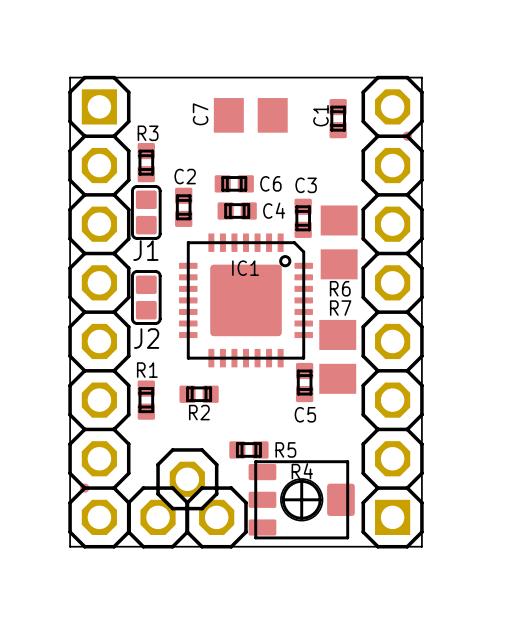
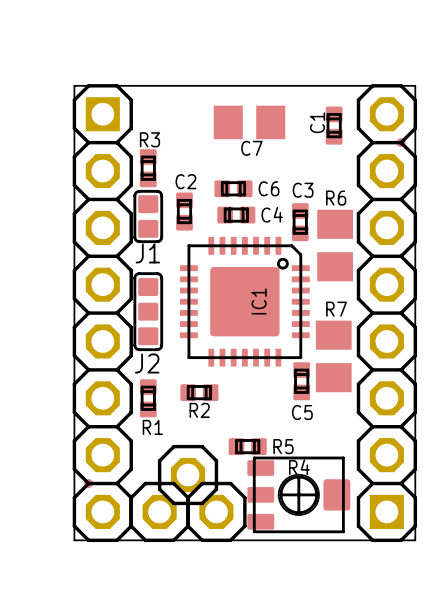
C7 name rotation: 0° (200, 114) -> 90° clockwise (251, 148)
C7 name position: C7 (200, 114) -> C7 (251, 148)
IC1 name rotation: 0° (245, 268) -> 90° counterclockwise (259, 301)
J2 footprint: [130, 270, 162, 325] -> [133, 272, 164, 352]
R6 name position: R6 (340, 288) -> R6 (336, 198)
R1 name position: R1 (147, 370) -> R1 (152, 427)

